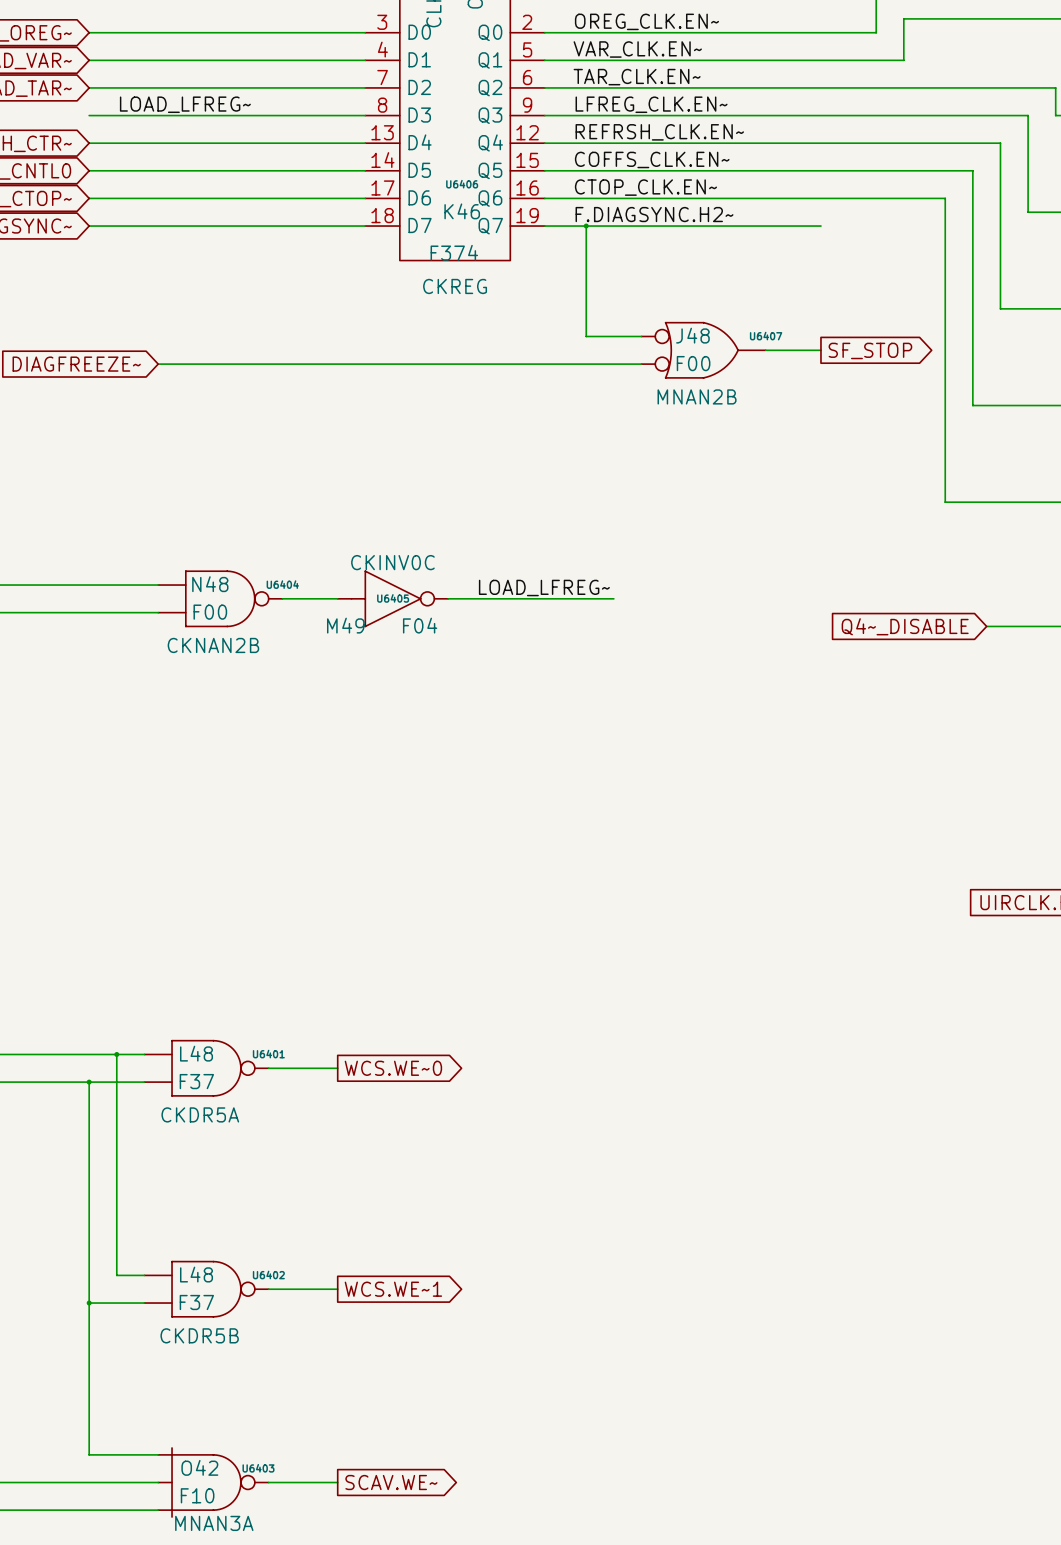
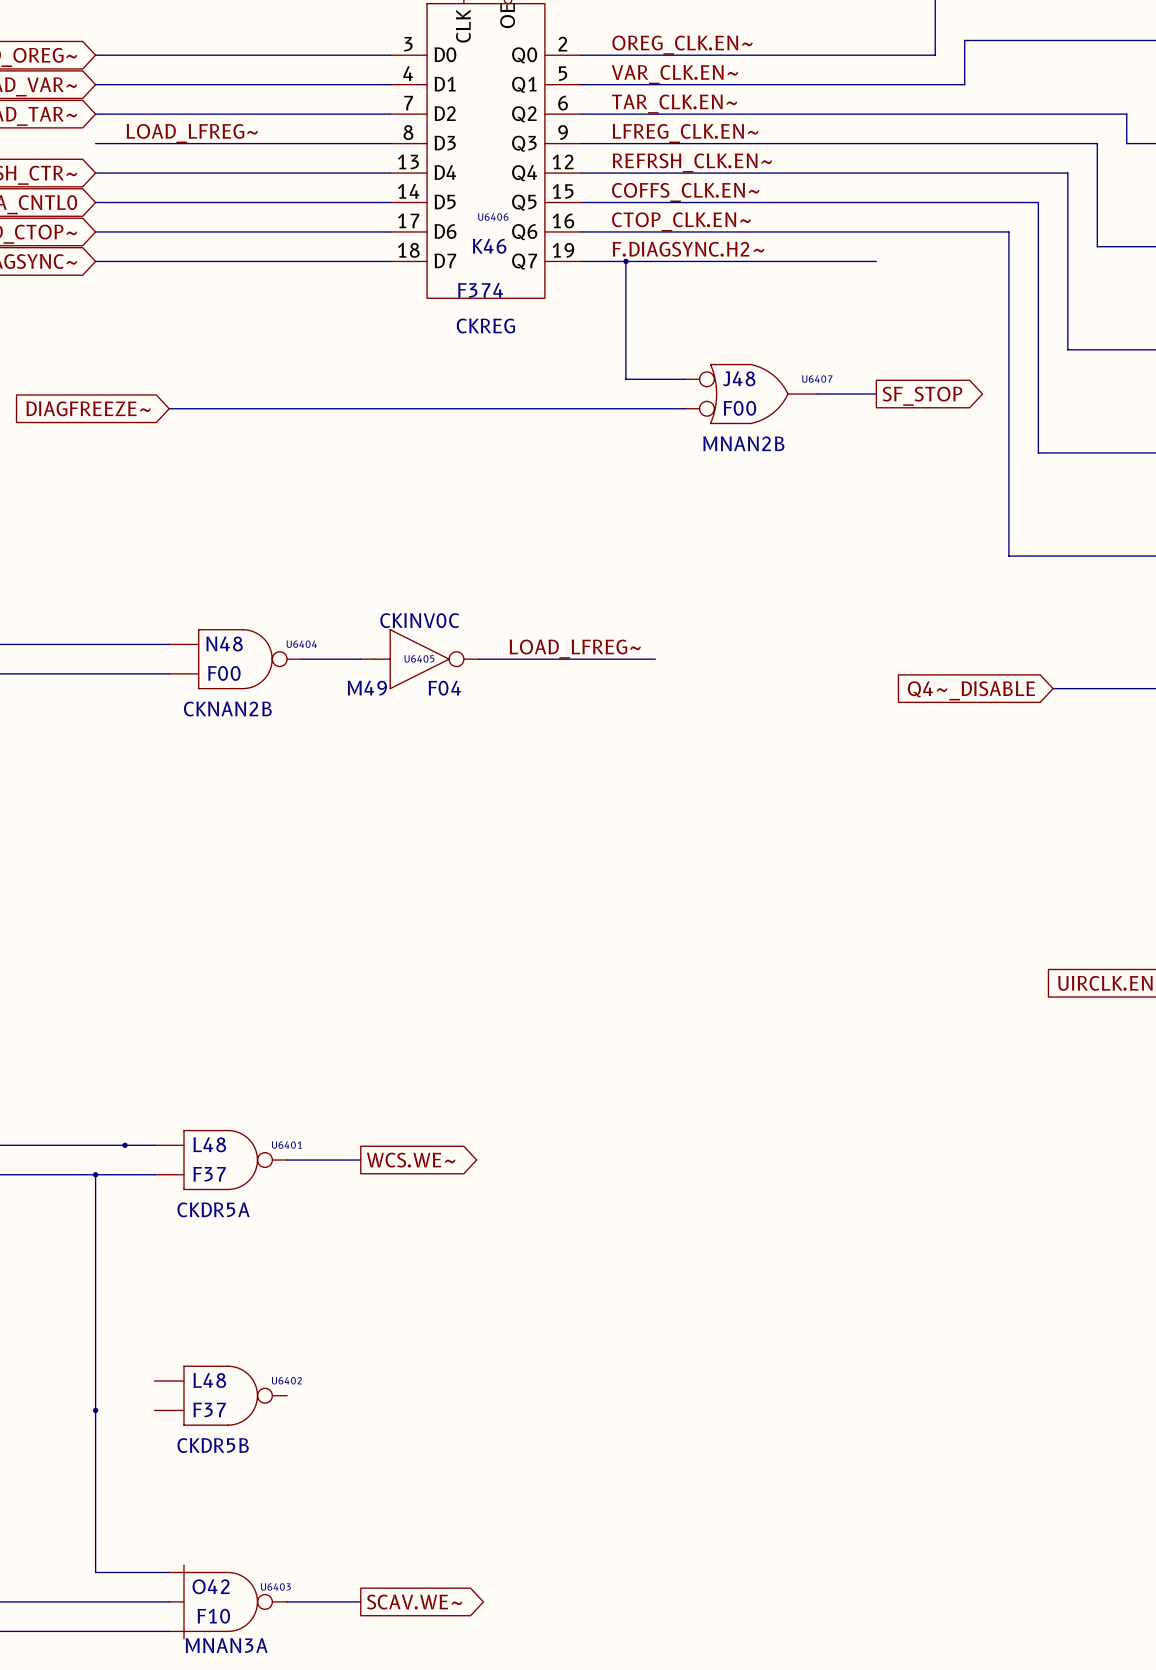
wire: (116, 1054) (116, 1275) (144, 1275) -> none
global label: WCS.WE~0 (393, 1068) -> WCS.WE~ (411, 1160)
wire: (268, 1289) (337, 1289) -> none
global label: WCS.WE~1 (393, 1289) -> none
wire: (89, 1303) (144, 1303) -> none

